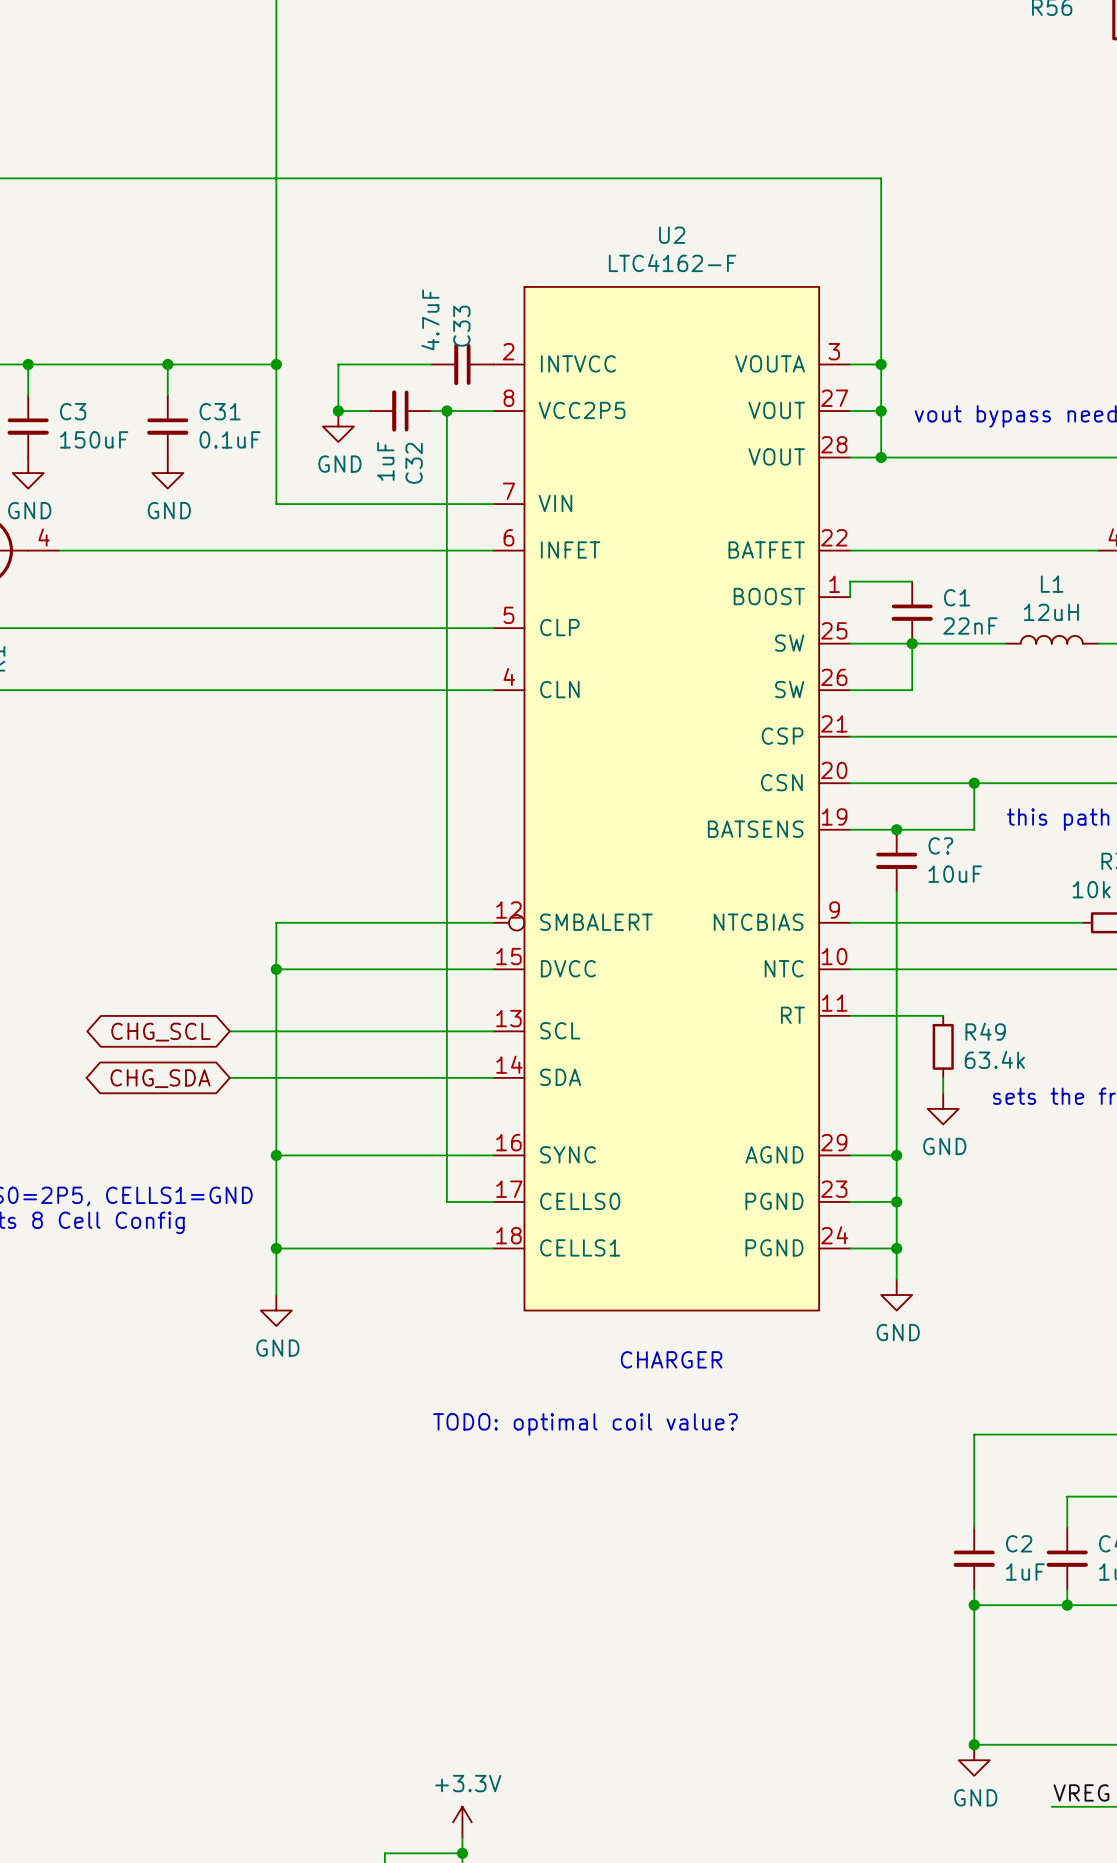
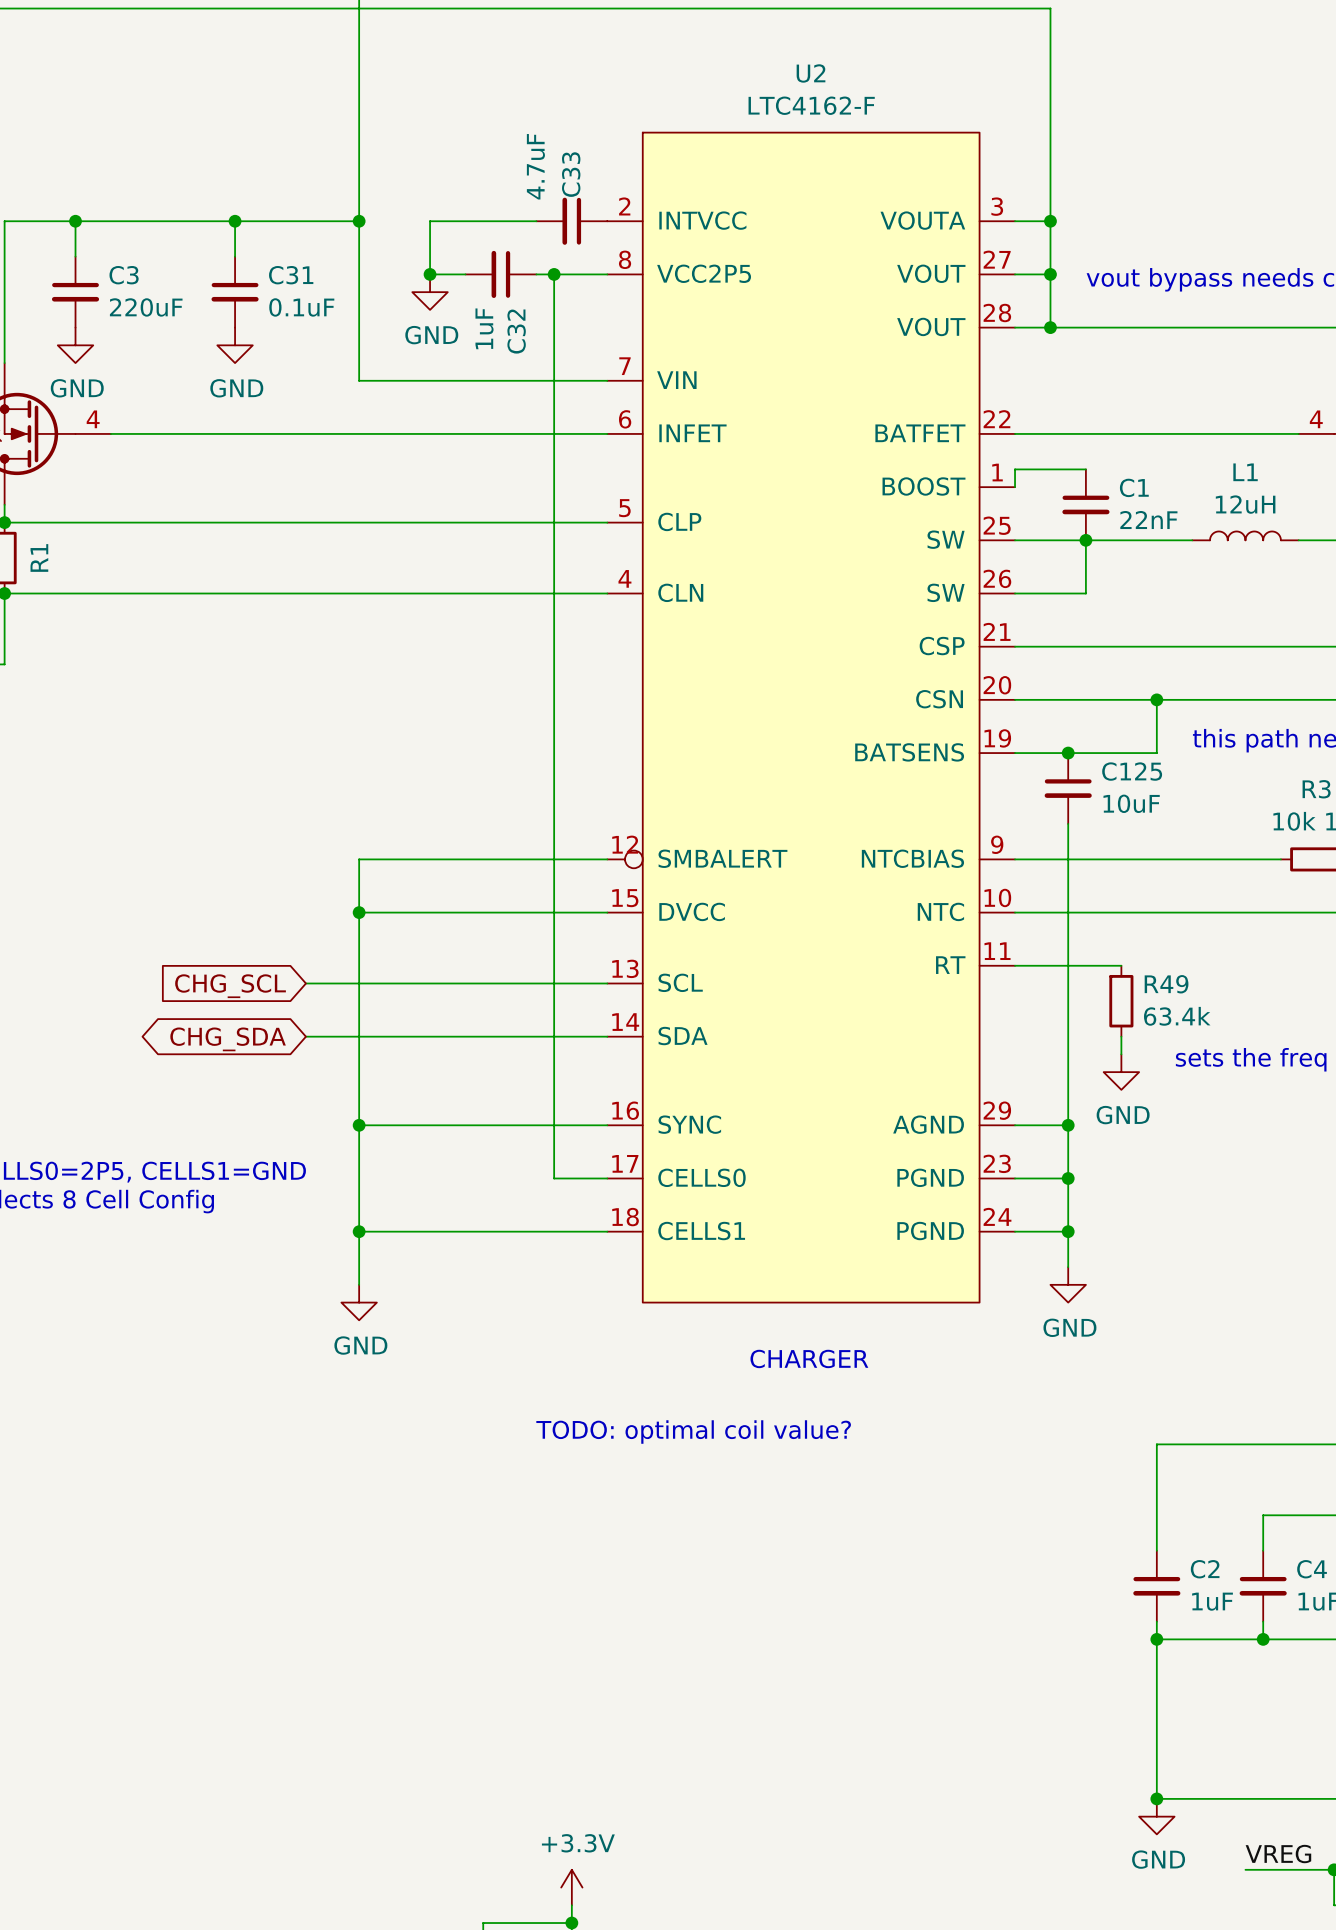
C3 value: 150uF (94, 439) -> 220uF (146, 307)
C? name: C? (940, 845) -> C125 (1132, 771)
global label shape: bidirectional (160, 1032) -> input (230, 986)

